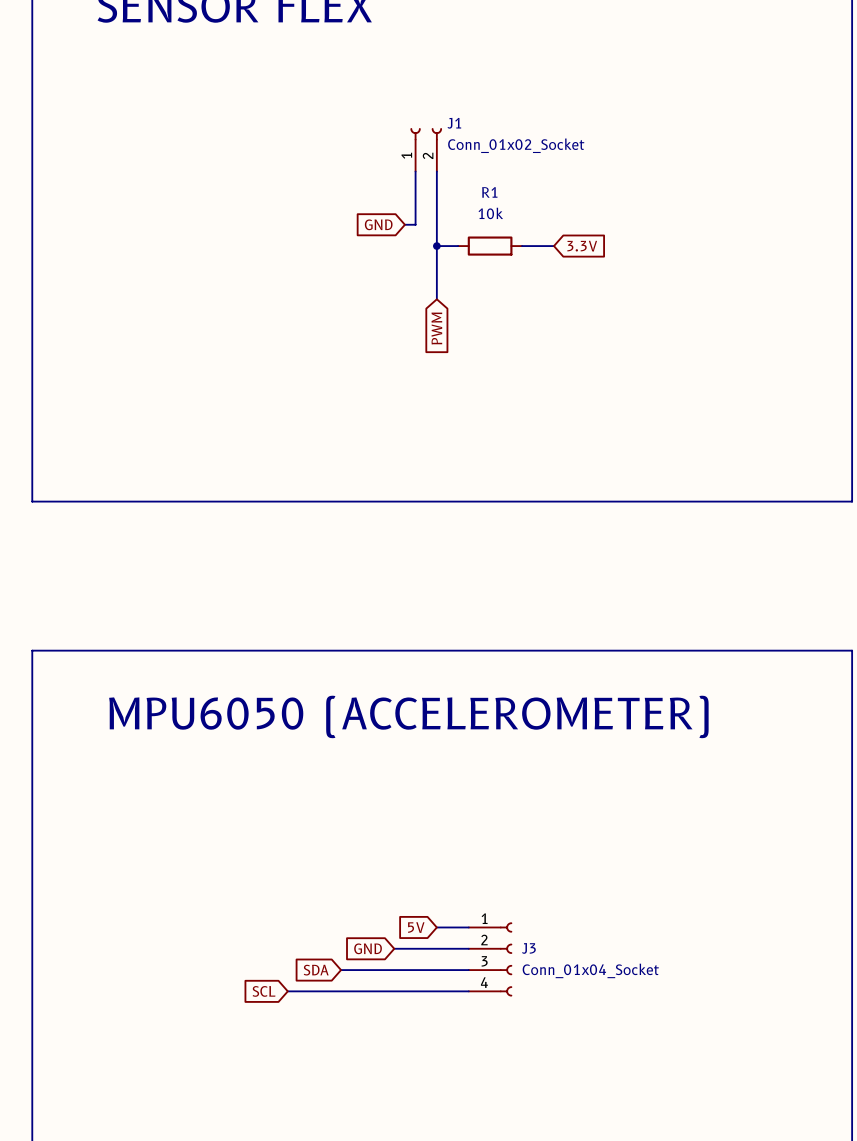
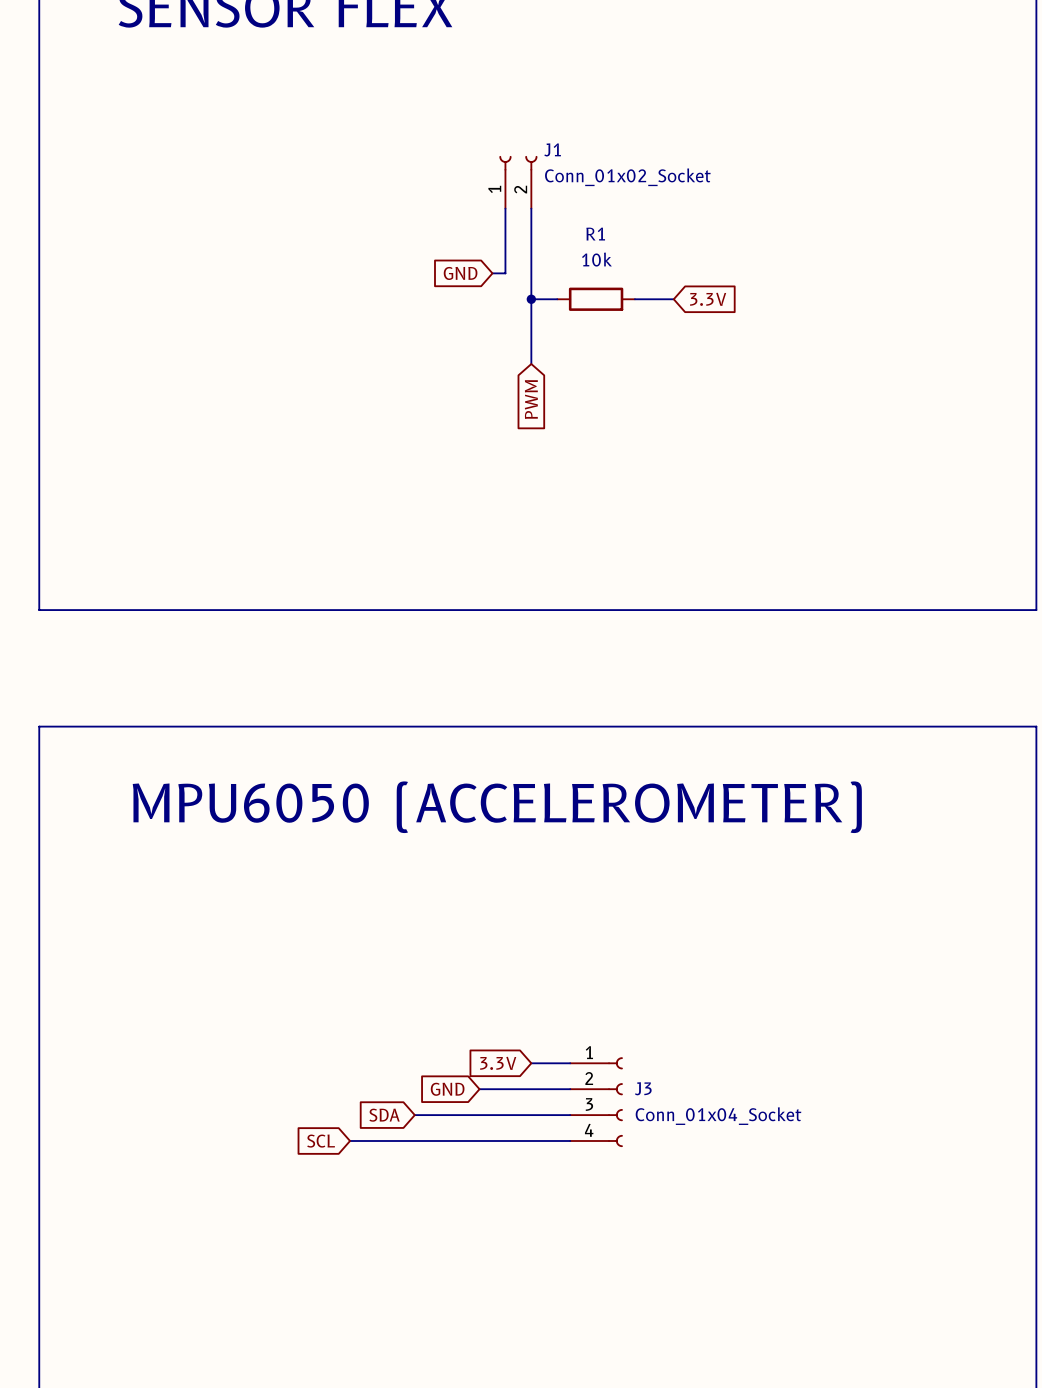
line: (32, 650) (852, 650) -> (39, 791) (39, 726) (1036, 726) (1036, 791)
text position: MPU6050 (ACCELEROMETER) (408, 716) -> MPU6050 (ACCELEROMETER) (497, 807)
global label: none -> 3.3V (498, 1063)
global label: 5V (416, 927) -> none
wire: (436, 927) (468, 927) -> (531, 1063) (570, 1063)
global label position: GND (368, 948) -> GND (447, 1089)
wire: (394, 948) (468, 948) -> (479, 1089) (570, 1089)
J3 position: (490, 959) -> (596, 1102)
global label position: SDA (316, 970) -> SDA (384, 1115)
wire: (341, 970) (468, 970) -> (414, 1115) (570, 1115)
global label position: SCL (264, 991) -> SCL (321, 1141)
wire: (287, 991) (468, 991) -> (350, 1140) (570, 1140)

